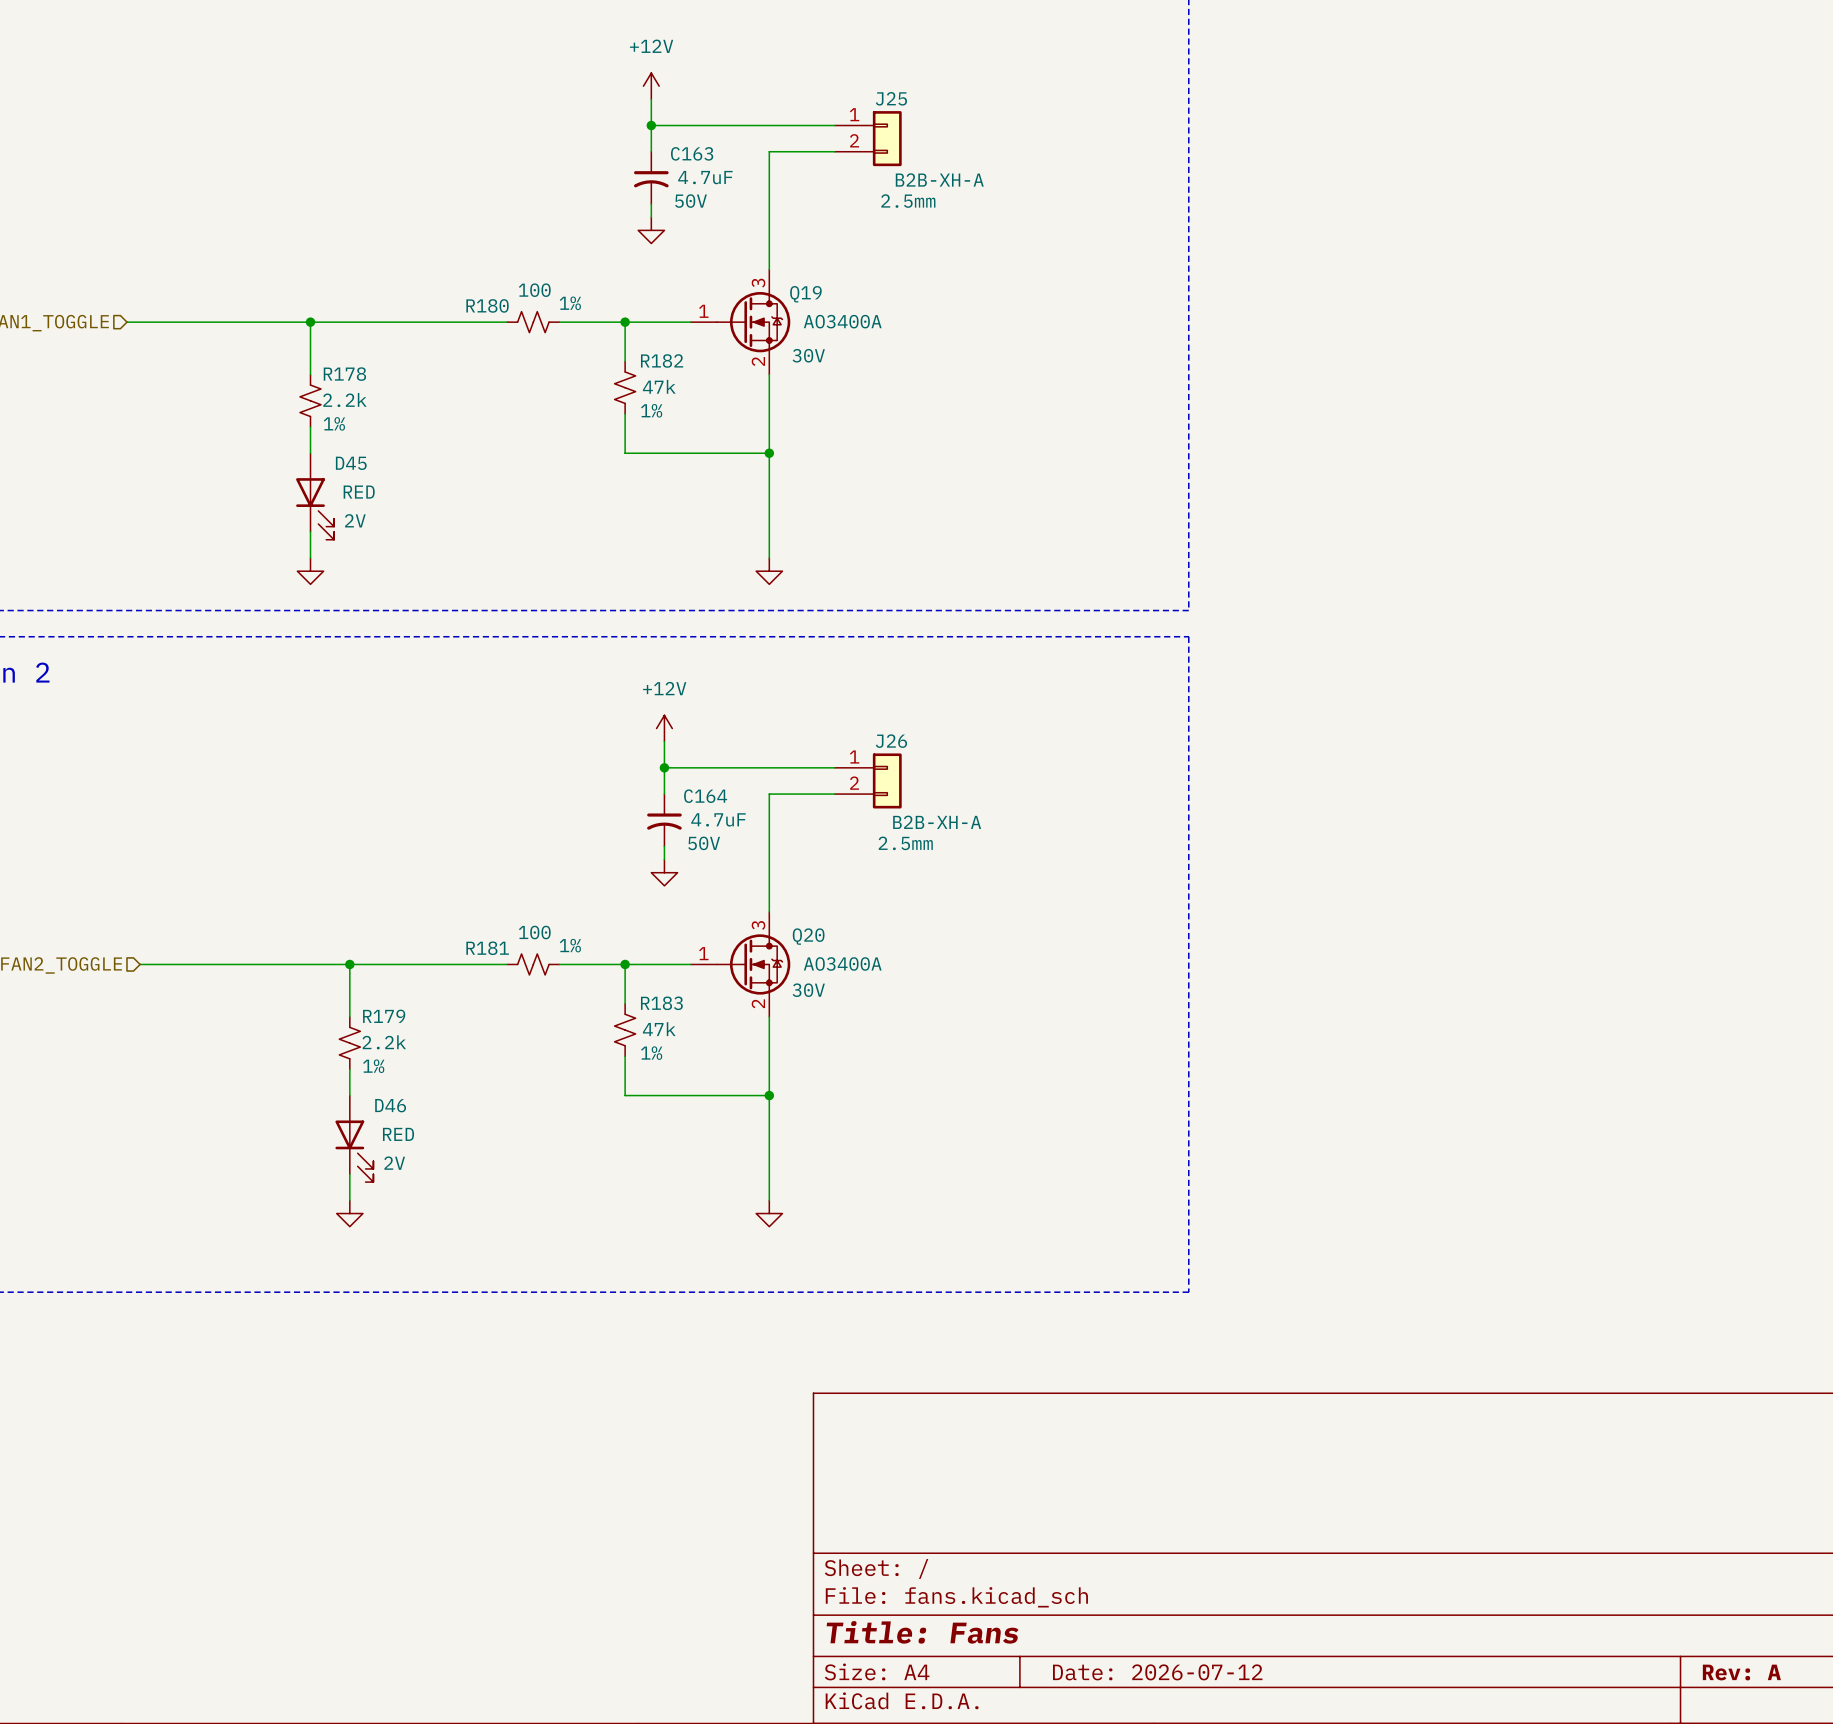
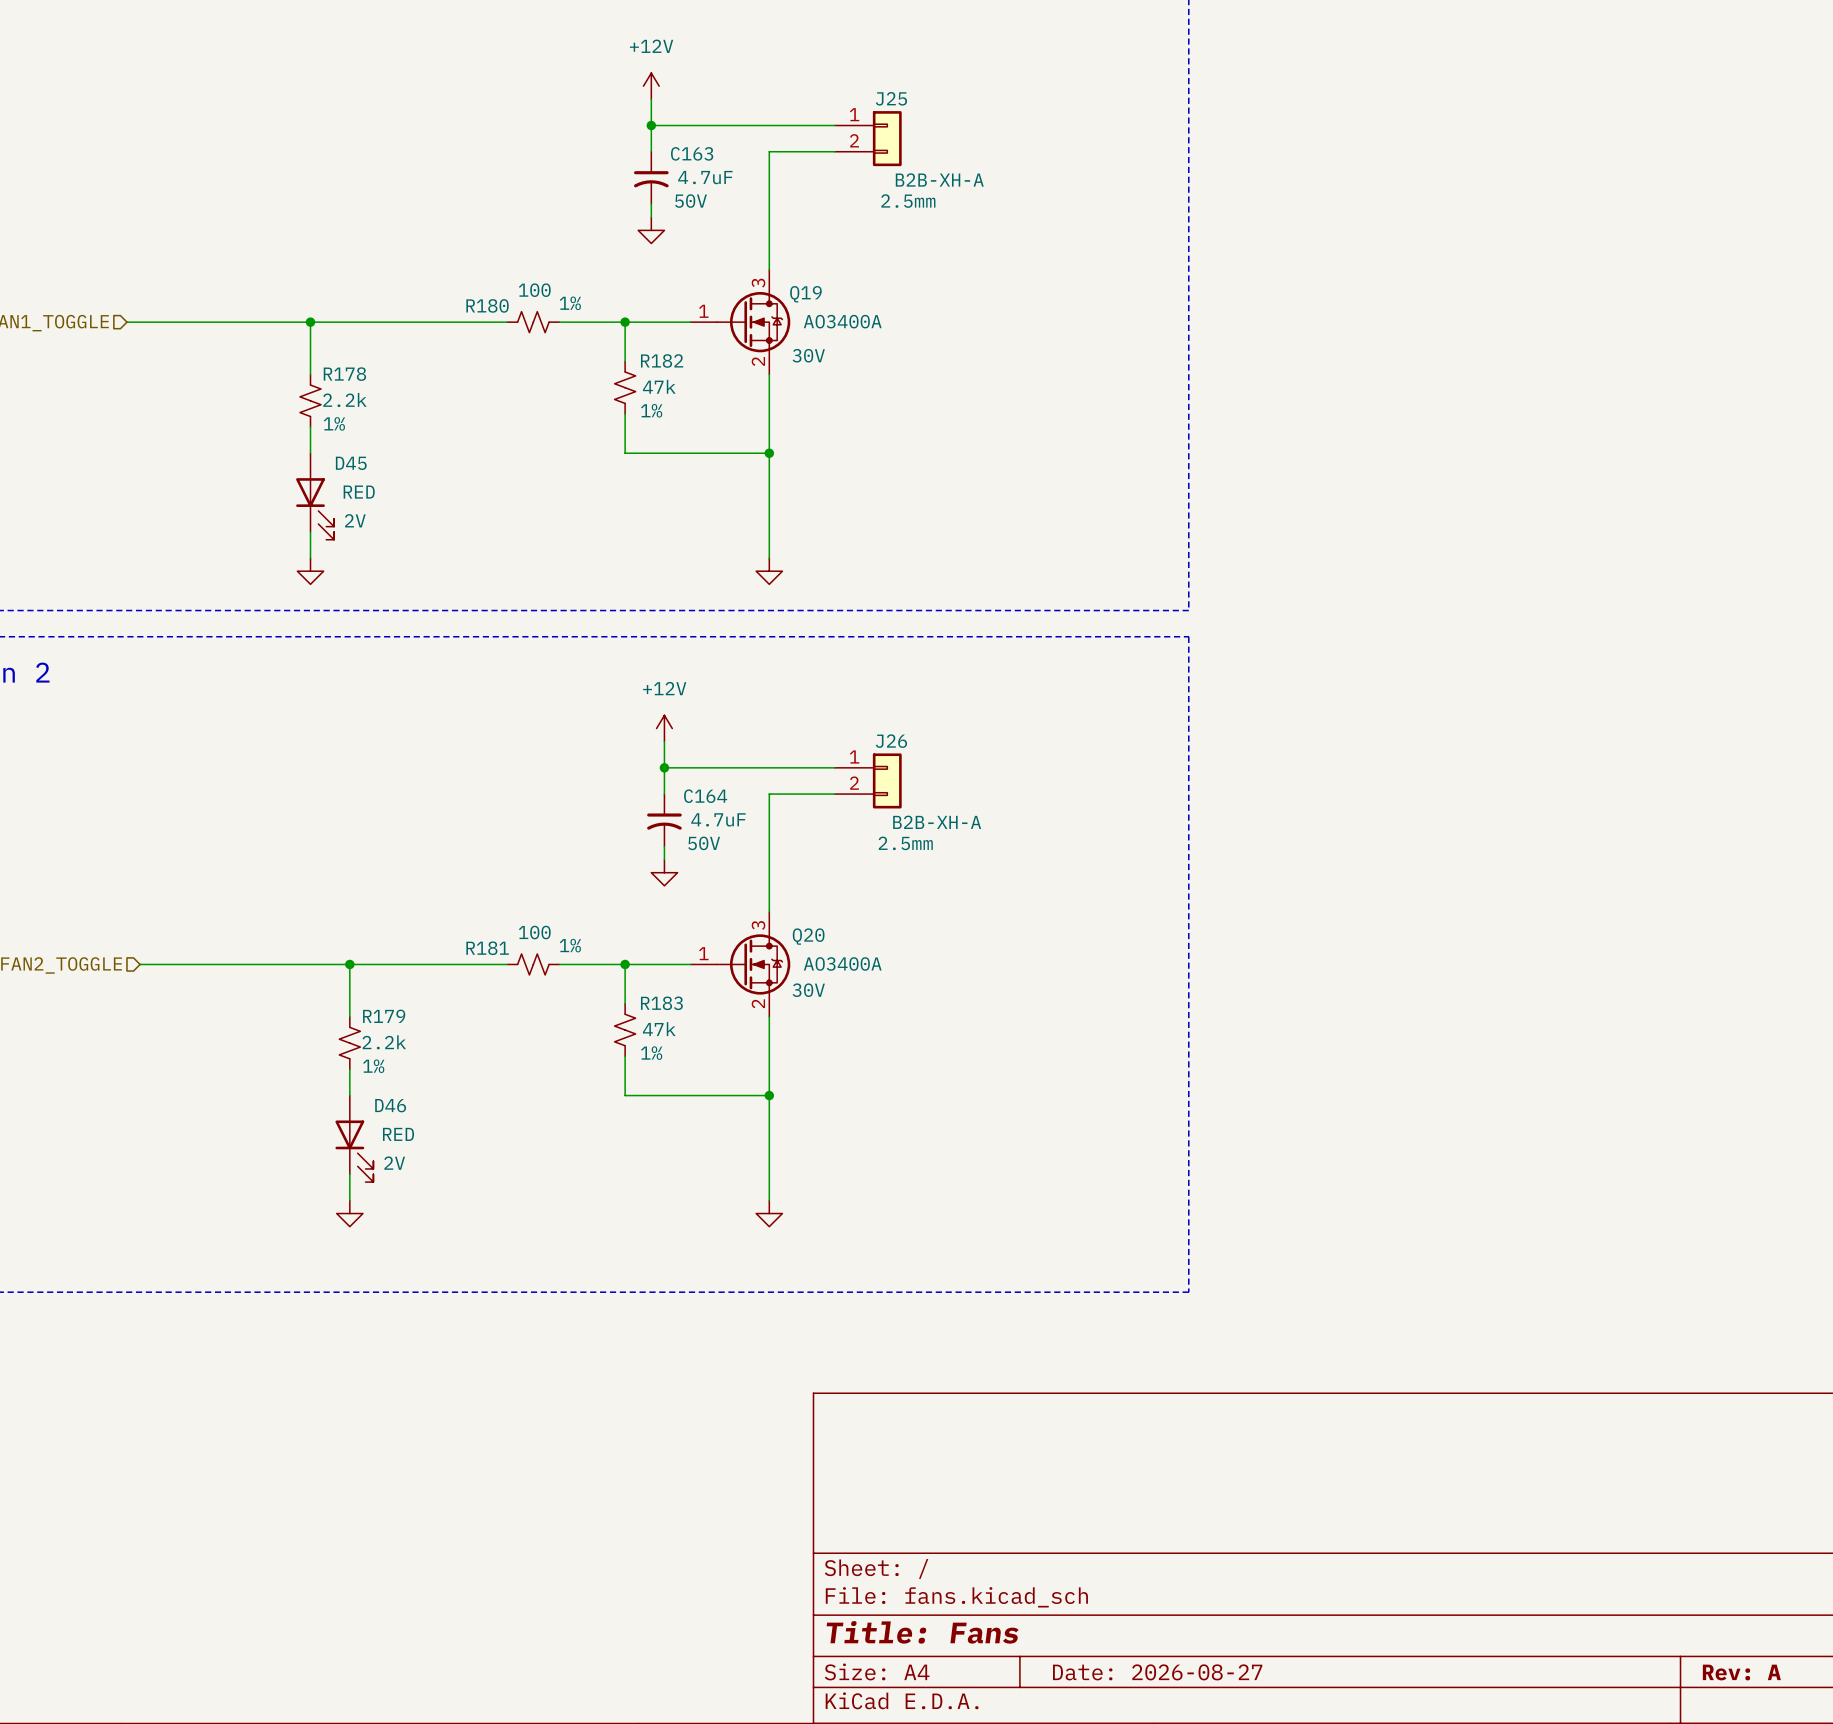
title block: Date: 2026-07-12 (1157, 1672) -> Date: 2026-08-27 (1157, 1672)

